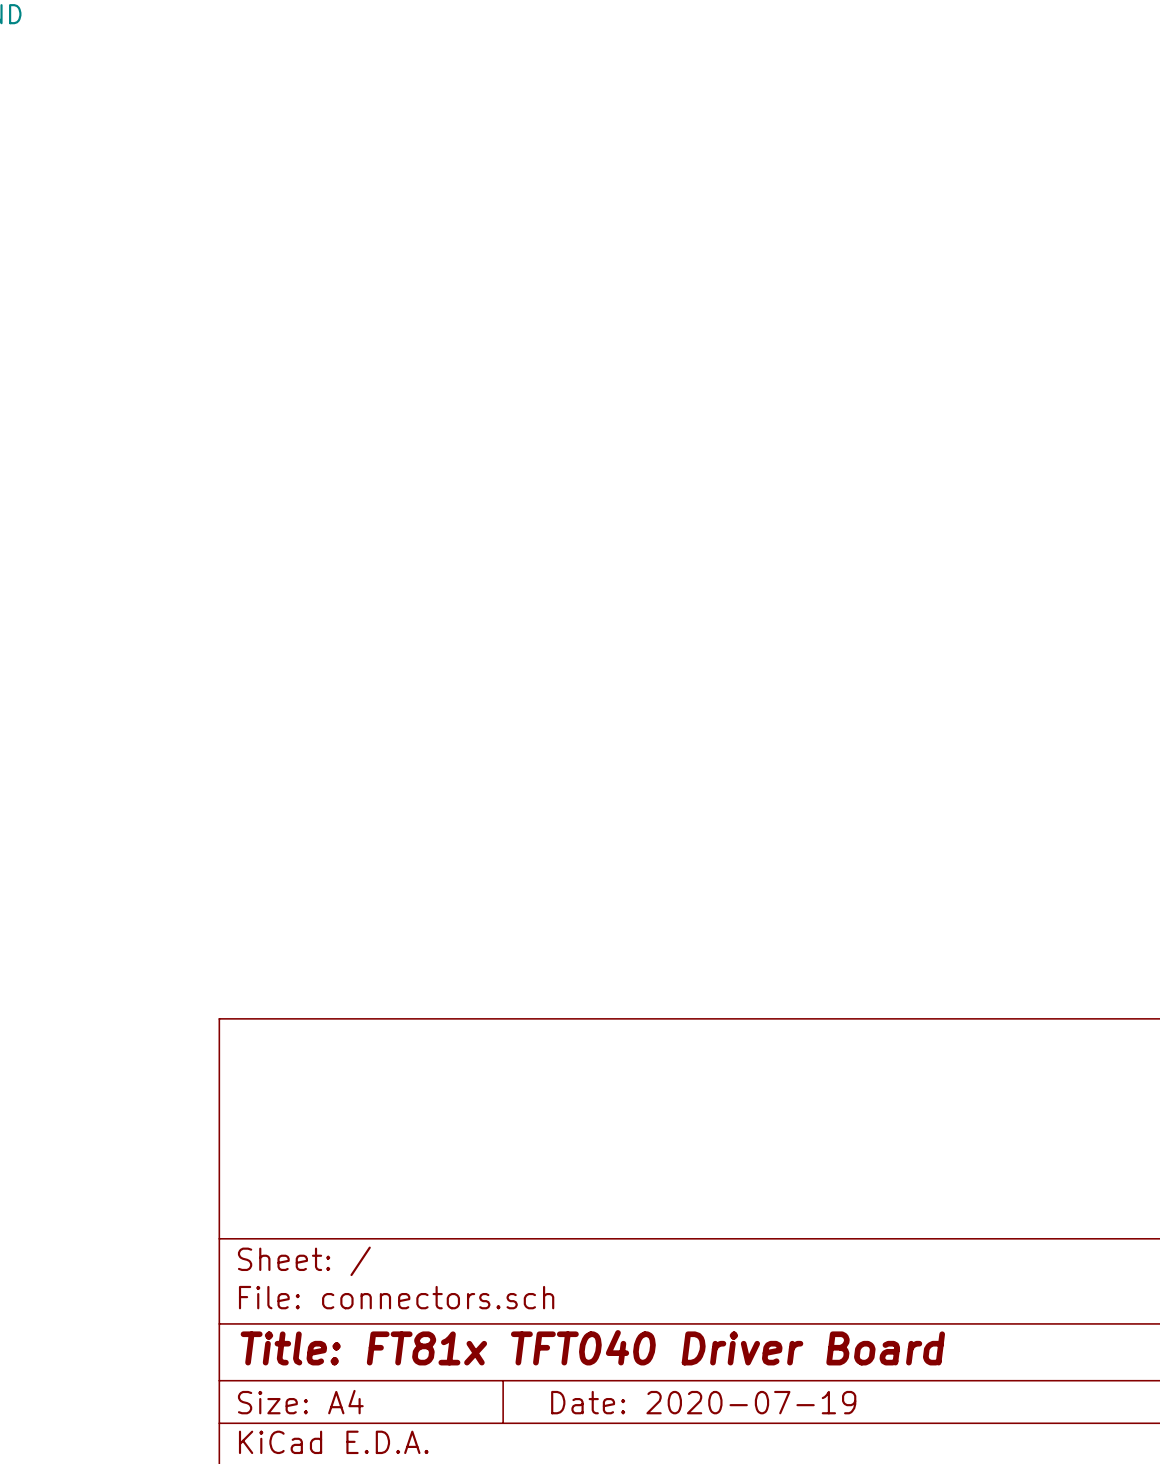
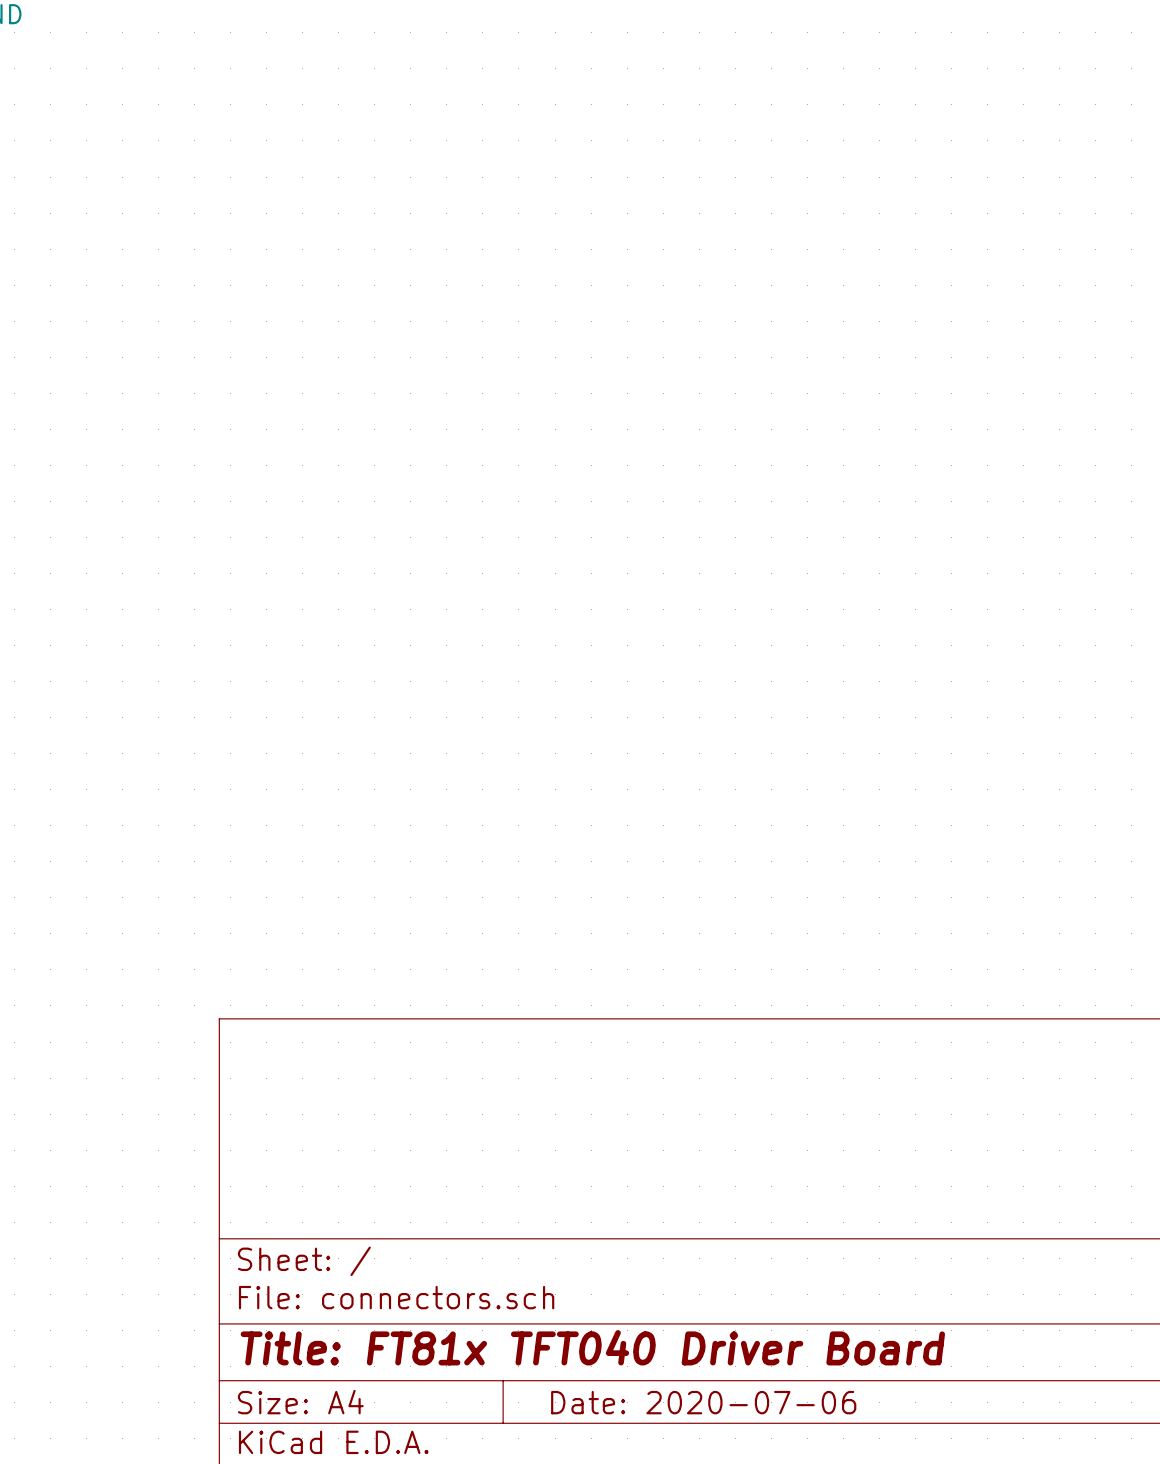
title block: Date: 2020-07-19 (703, 1402) -> Date: 2020-07-06 (703, 1402)

